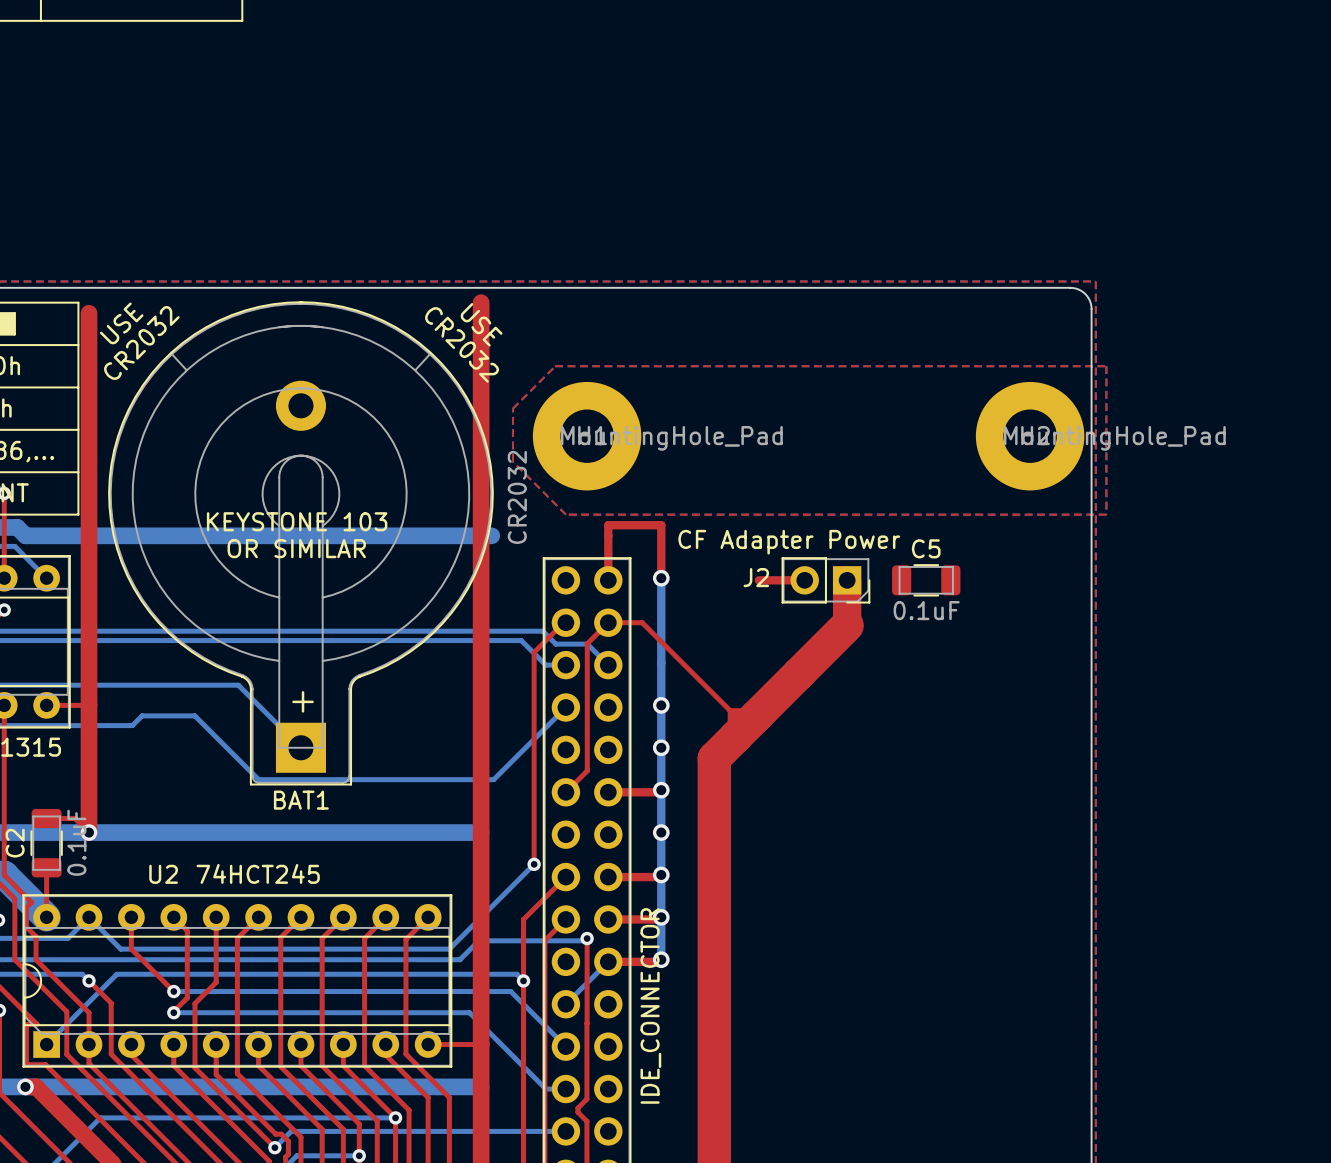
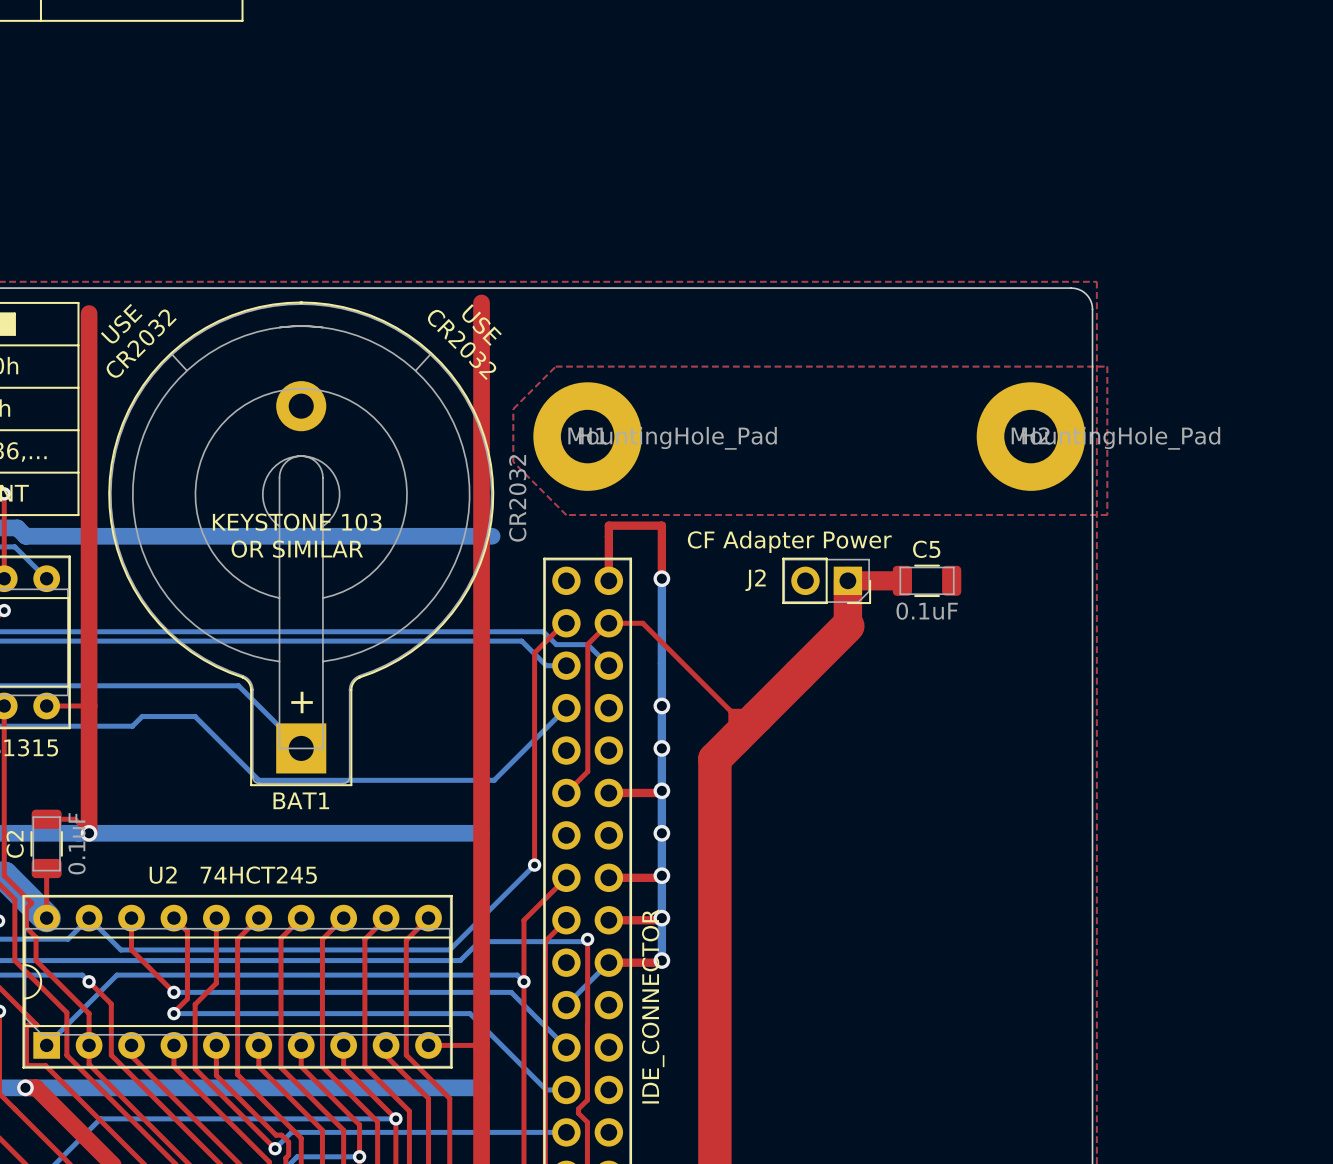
top track: (758, 580) (804, 580) -> none
top track: none -> (847, 580) (902, 580)

